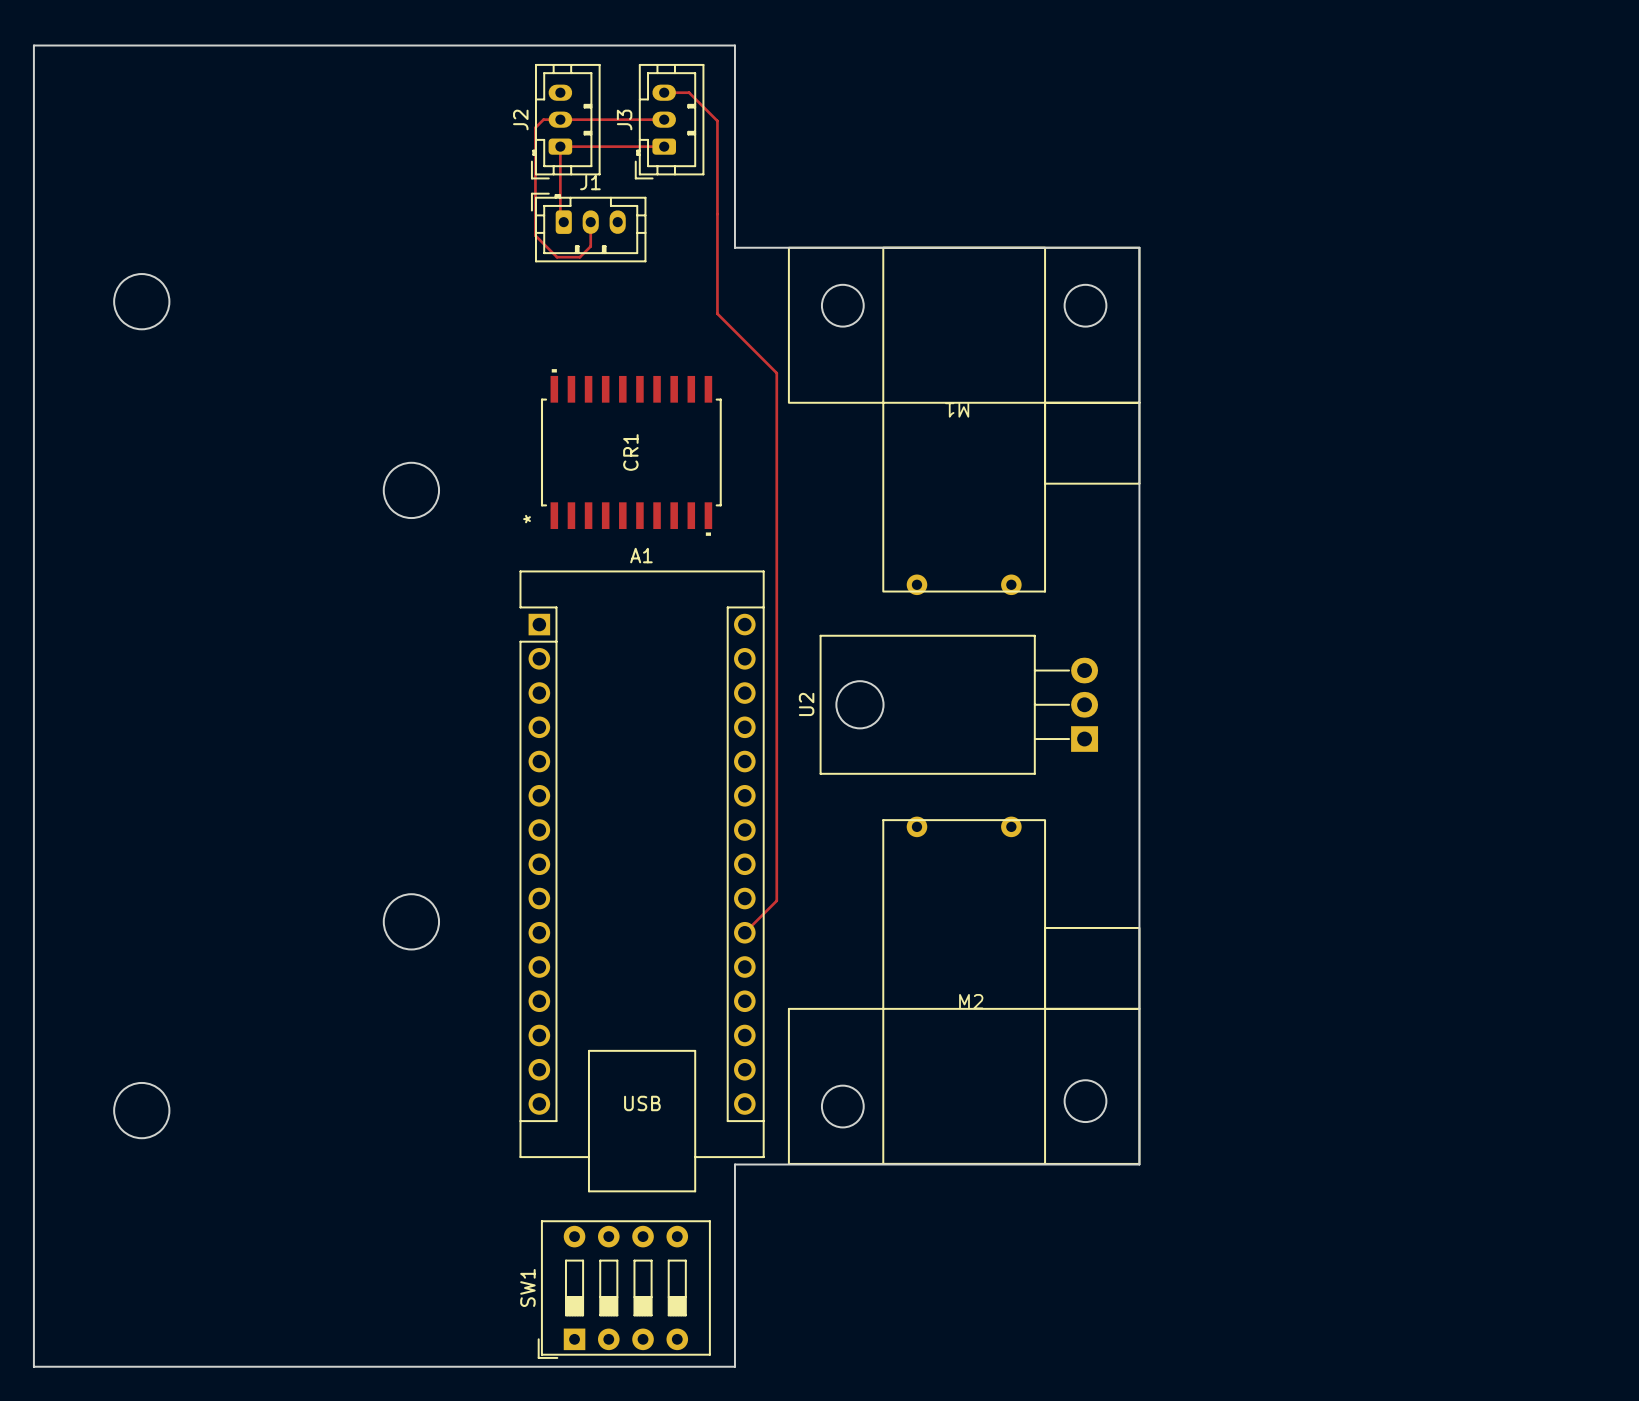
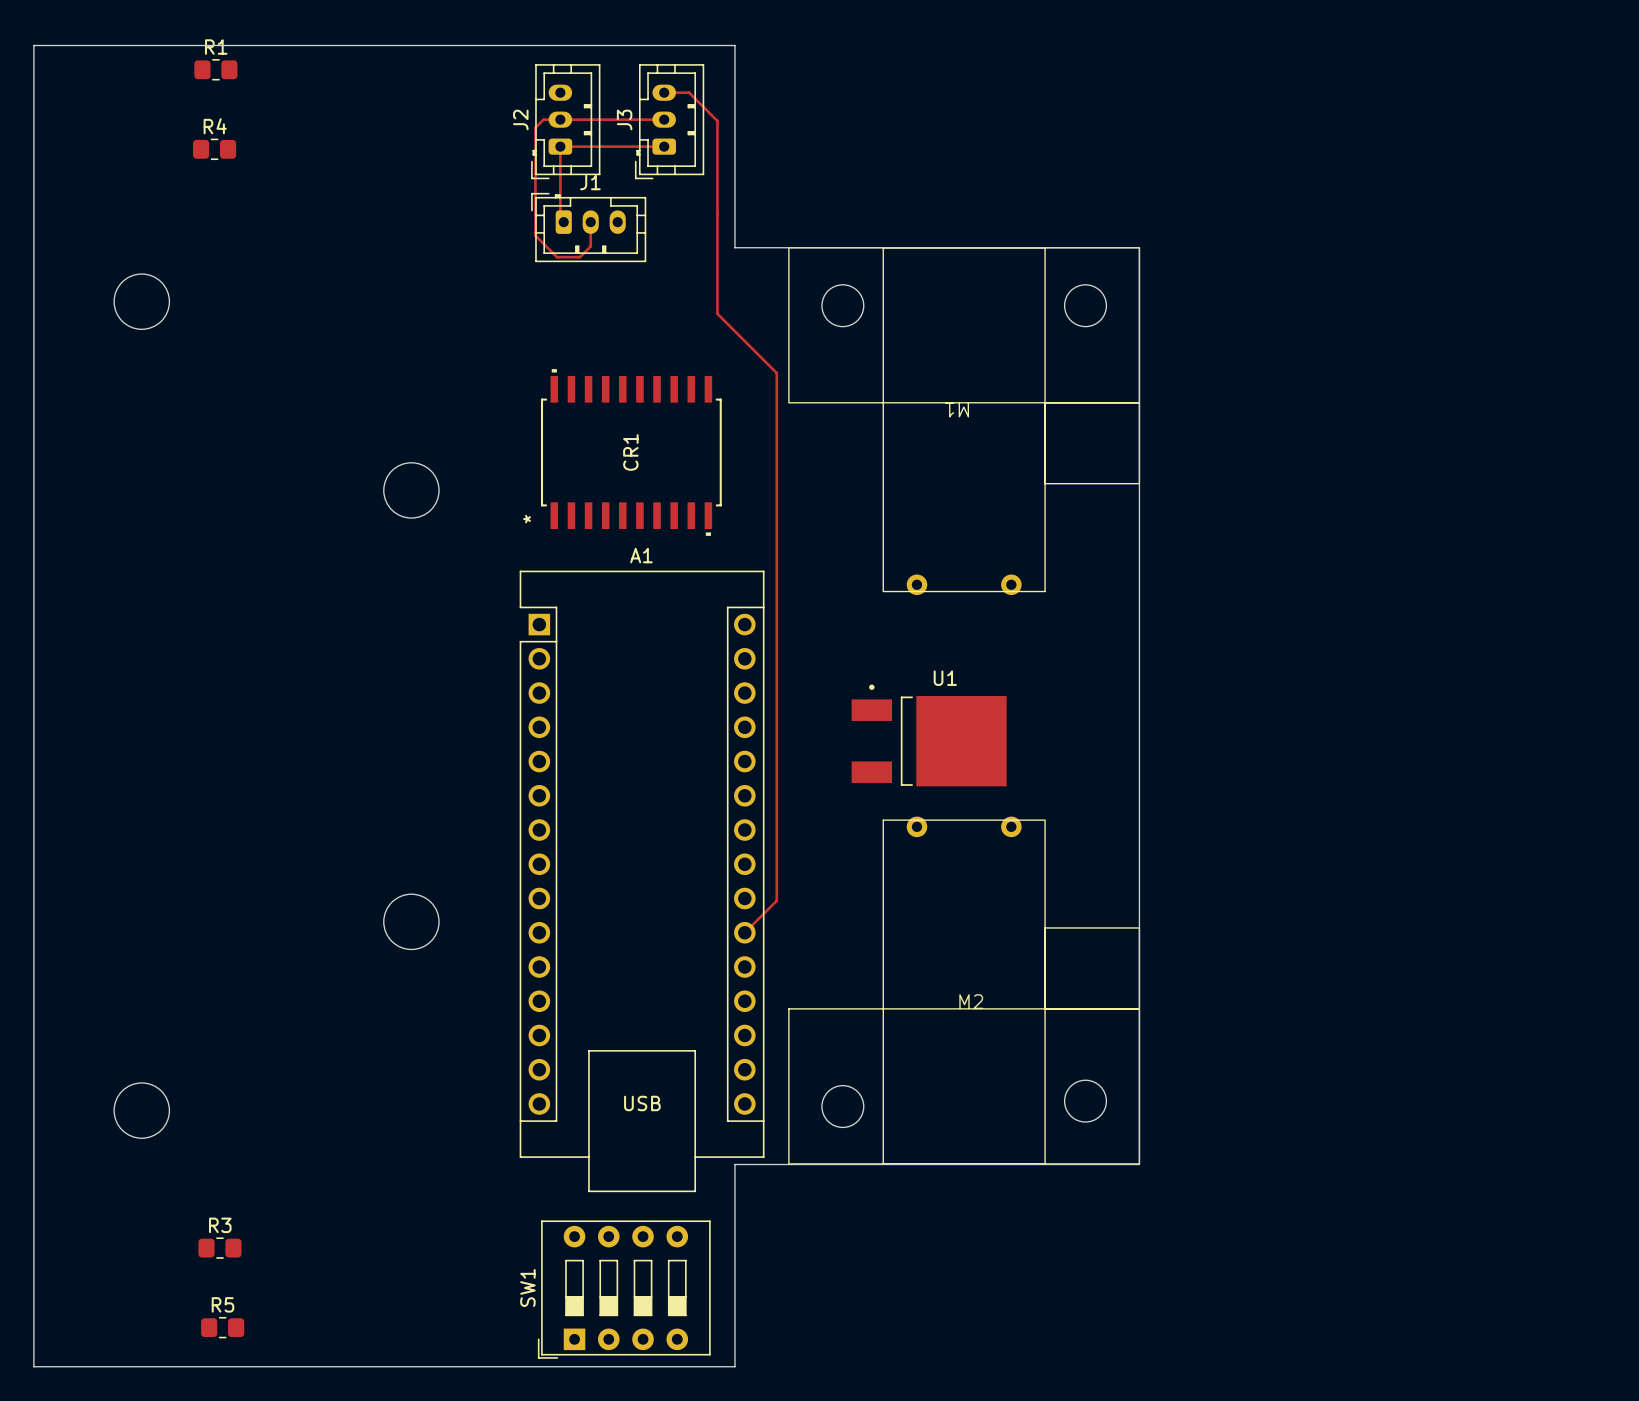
R1: none -> (215, 69)
R4: none -> (214, 149)
U2: (958, 704) -> none
U1: none -> (929, 735)
R3: none -> (219, 1248)
R5: none -> (222, 1327)

